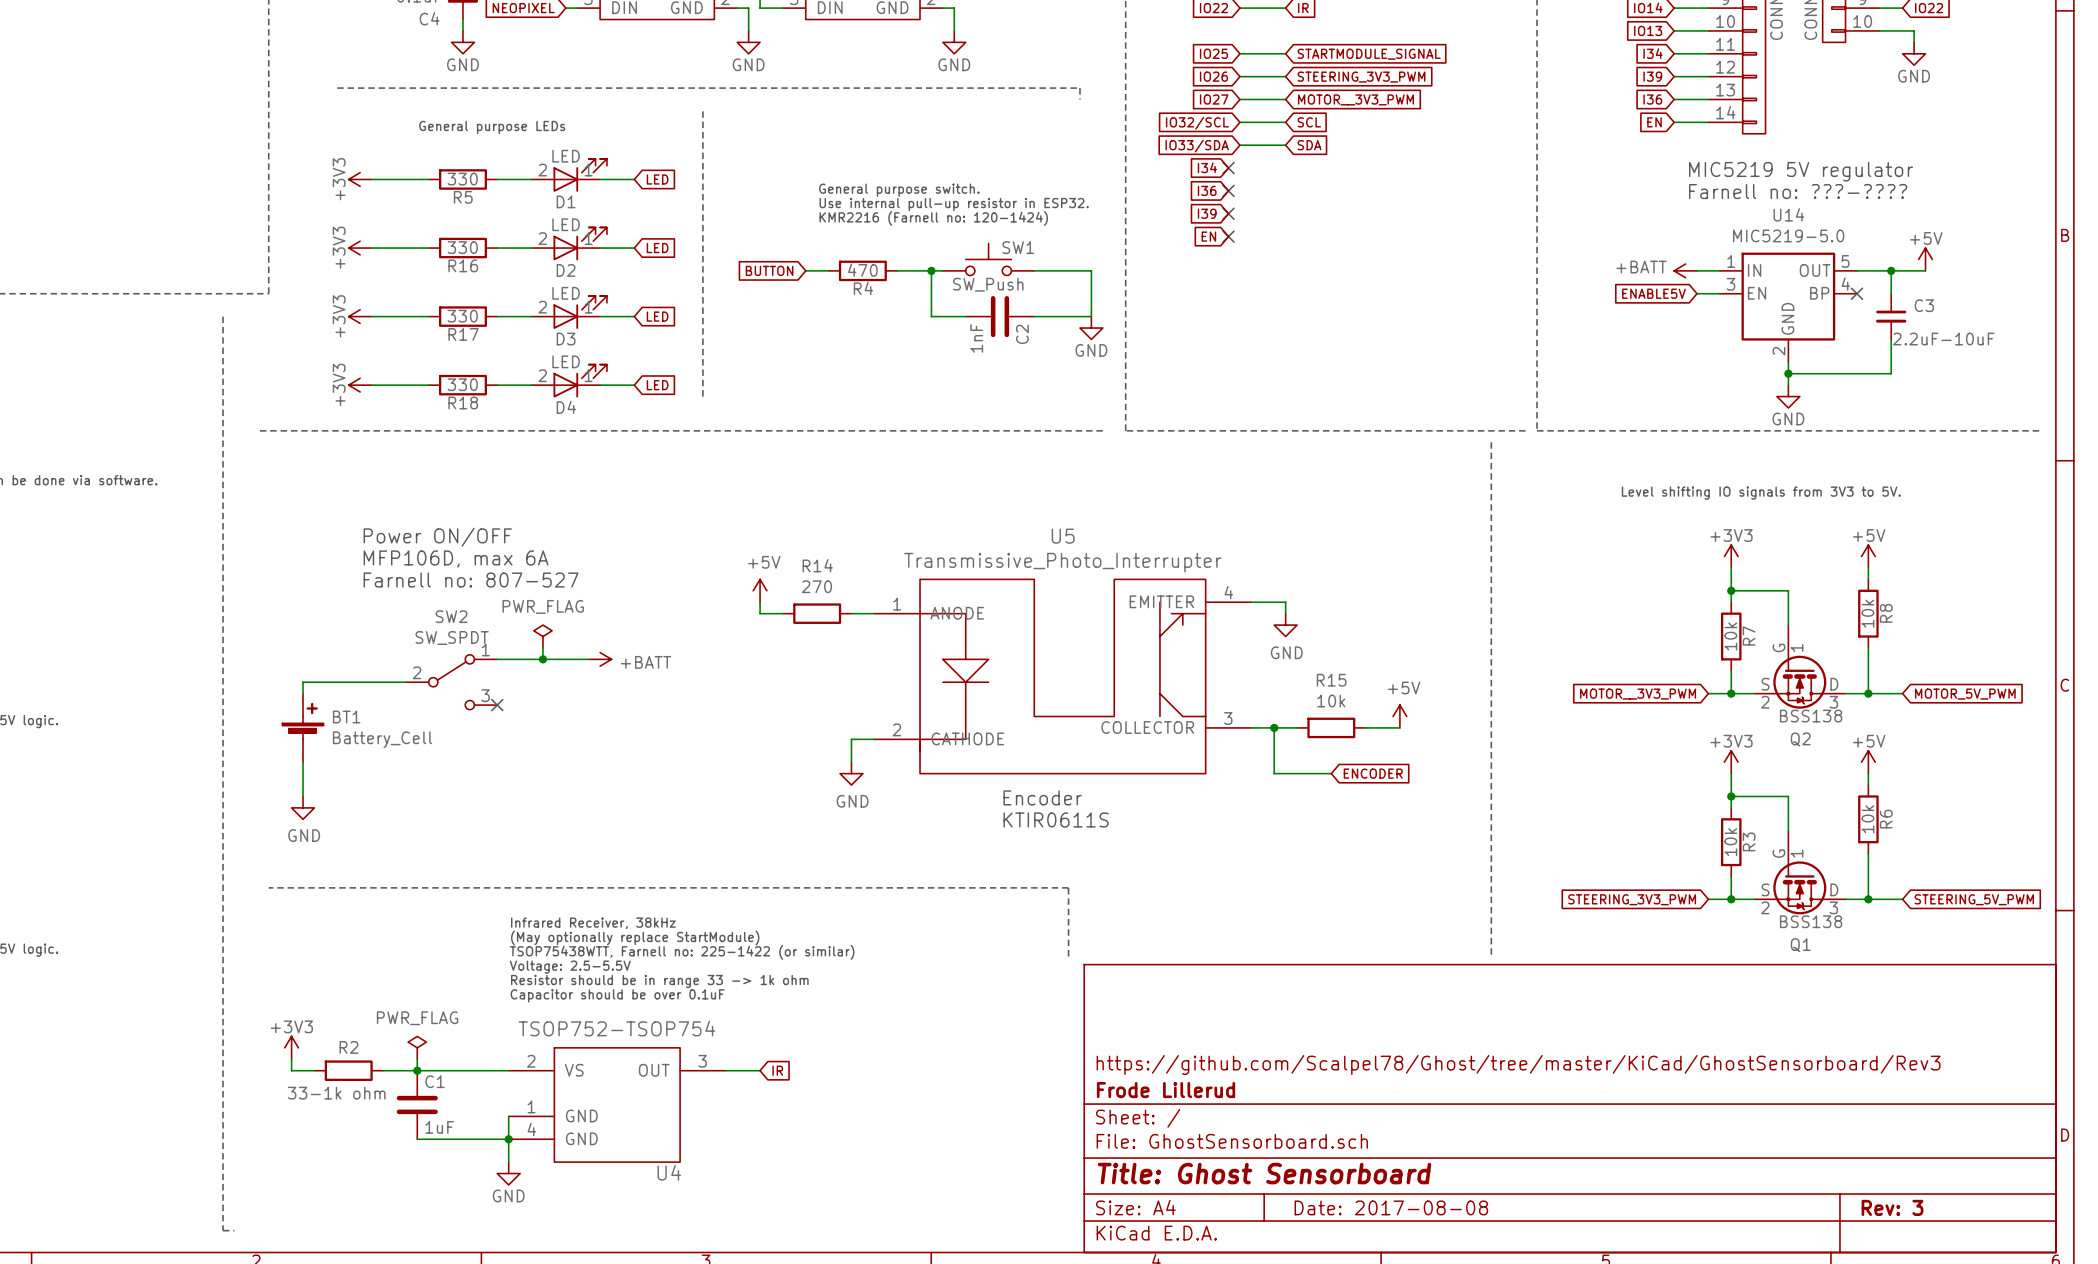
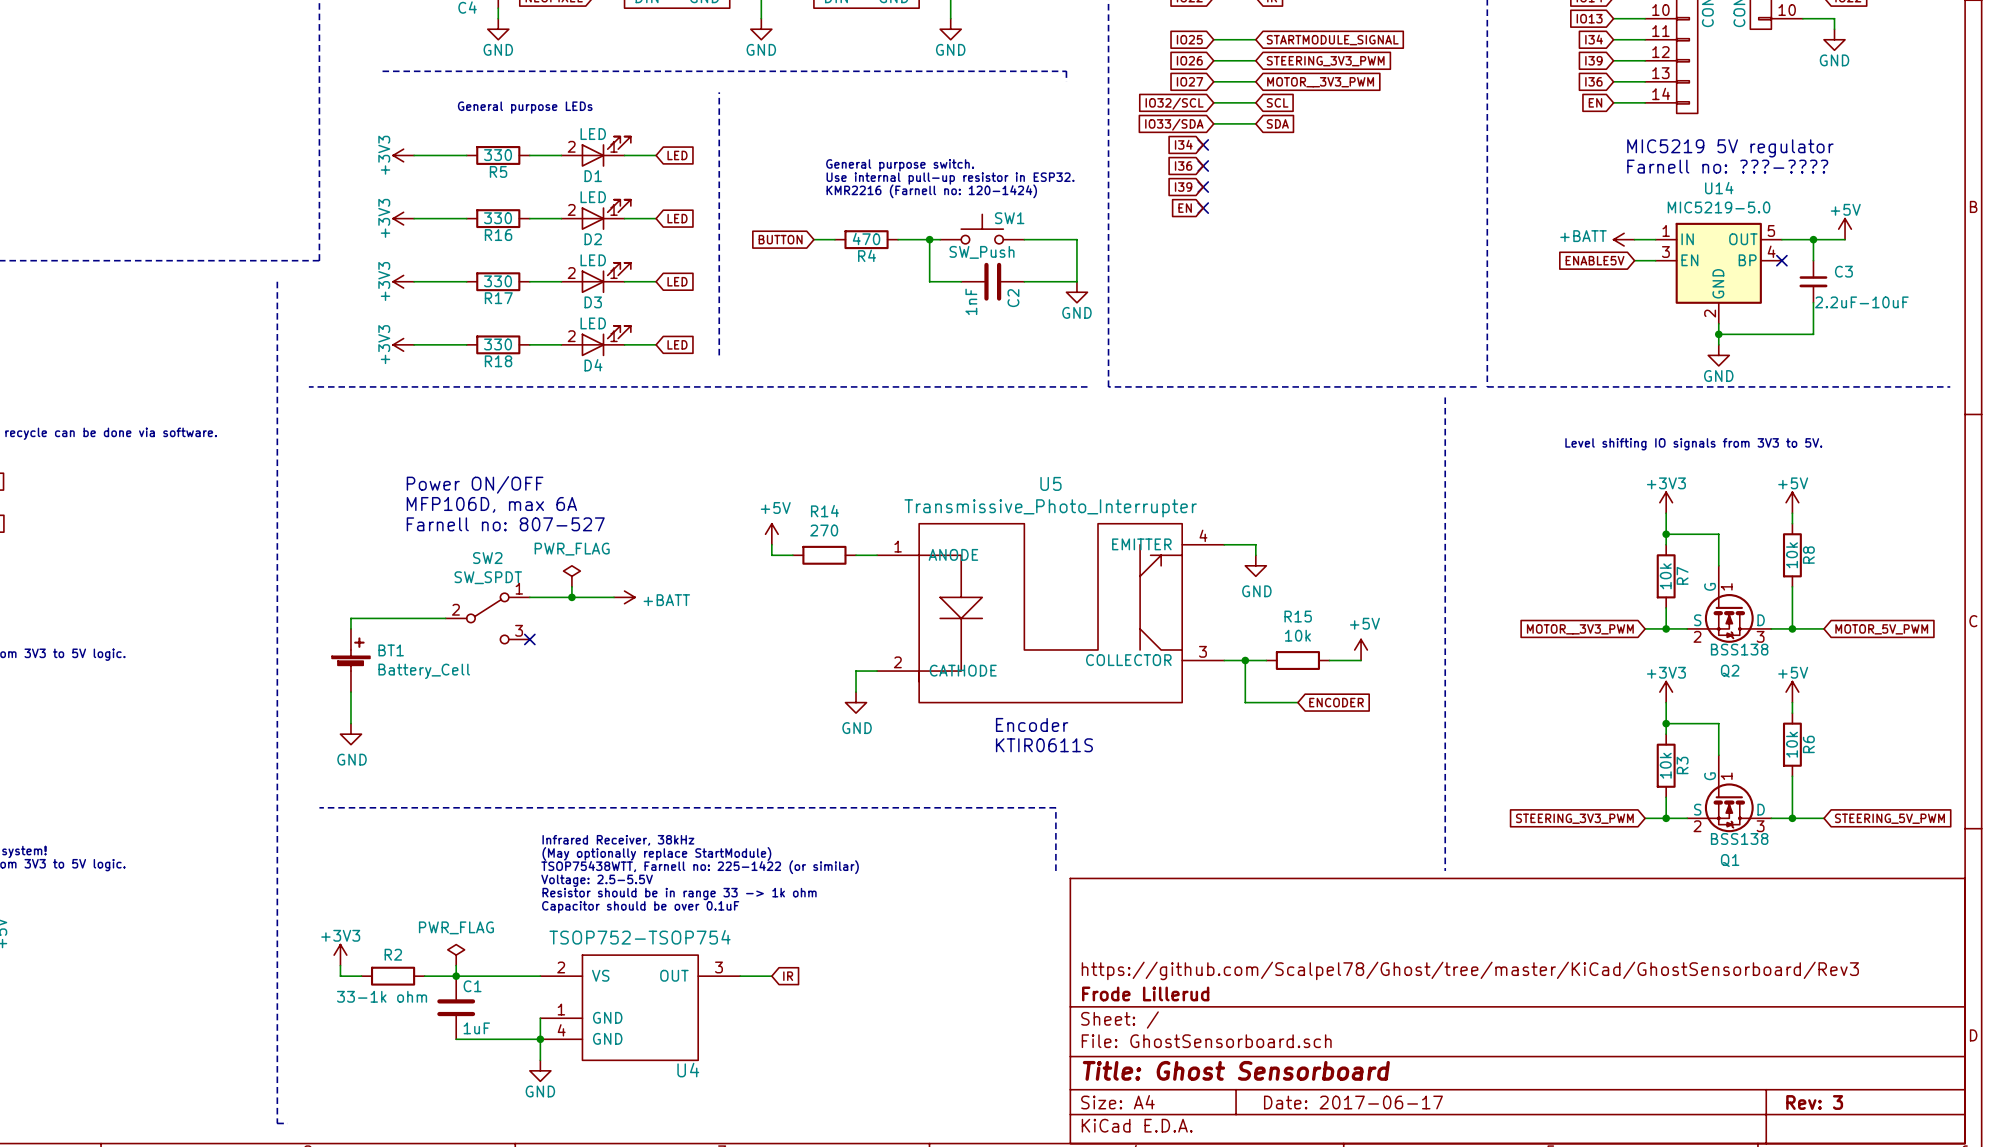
title block: Date: 2017-08-08 (1391, 1207) -> Date: 2017-06-17 (1353, 1102)

